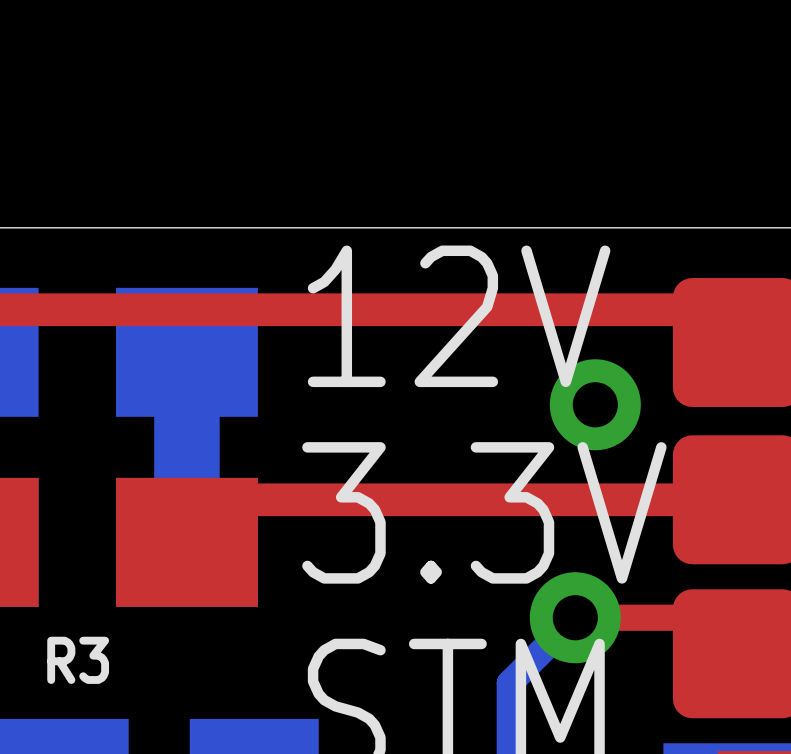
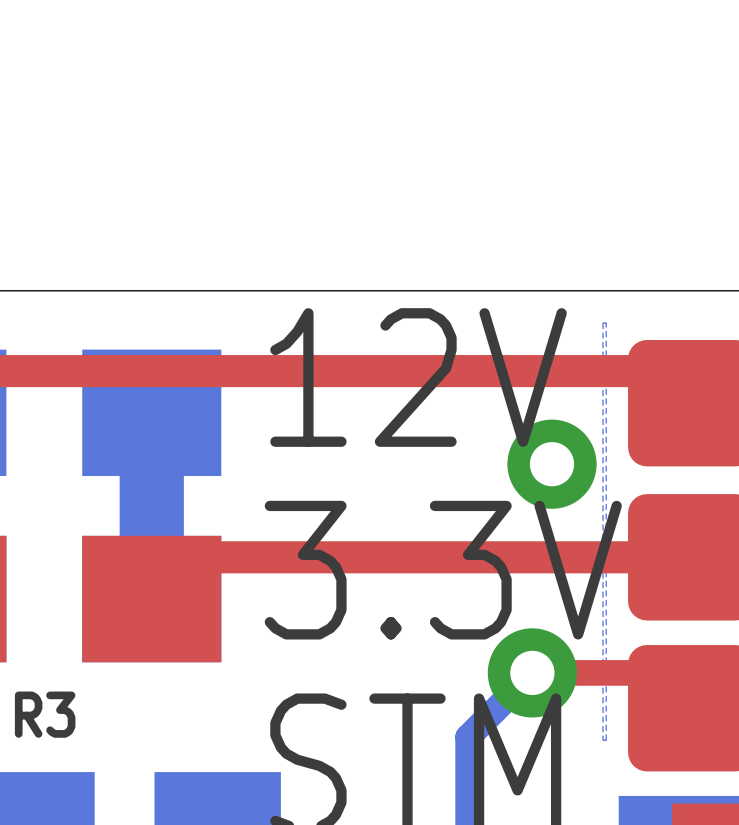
bottom zone outline: none -> (603, 322) (603, 740) (606, 740) (606, 322) (603, 322)

